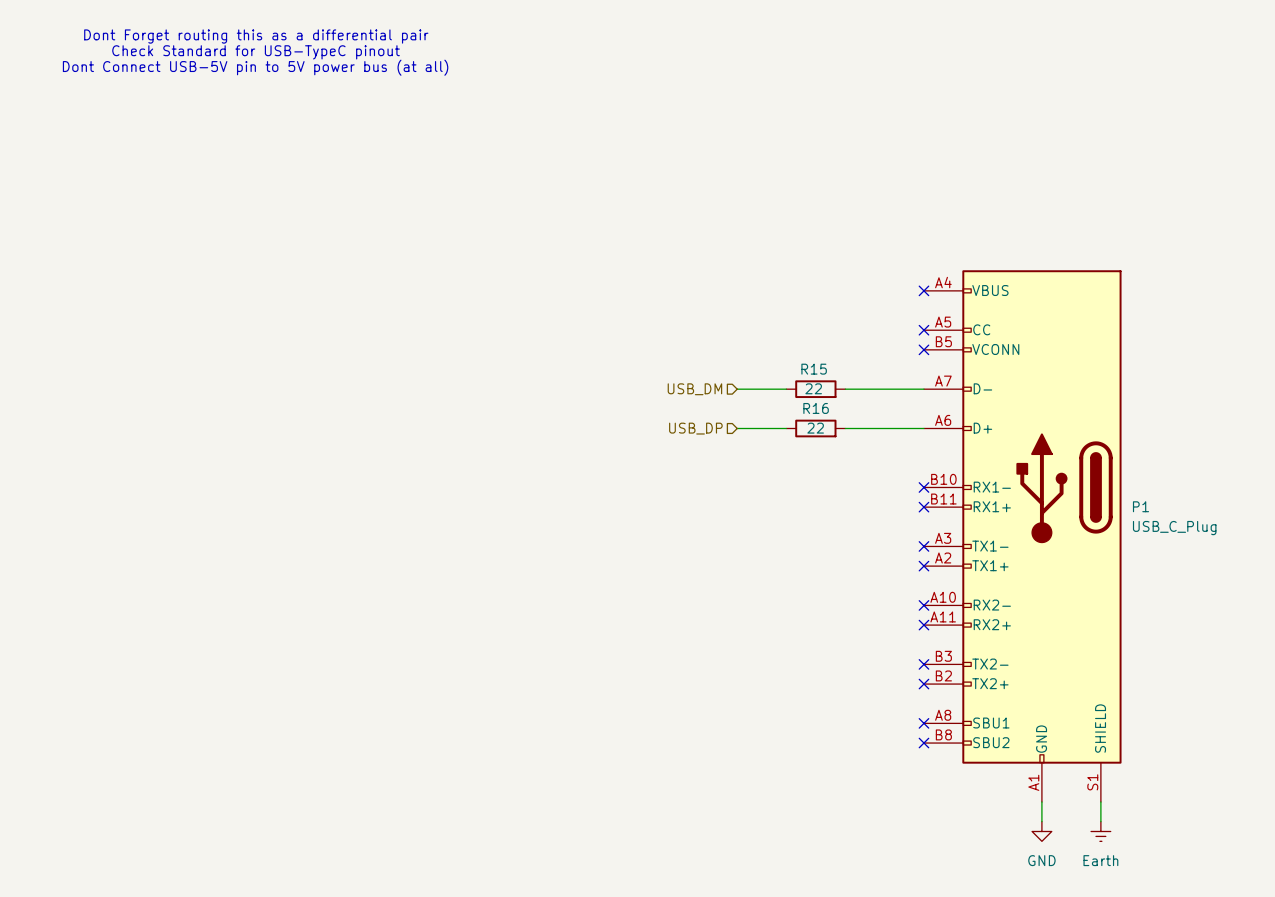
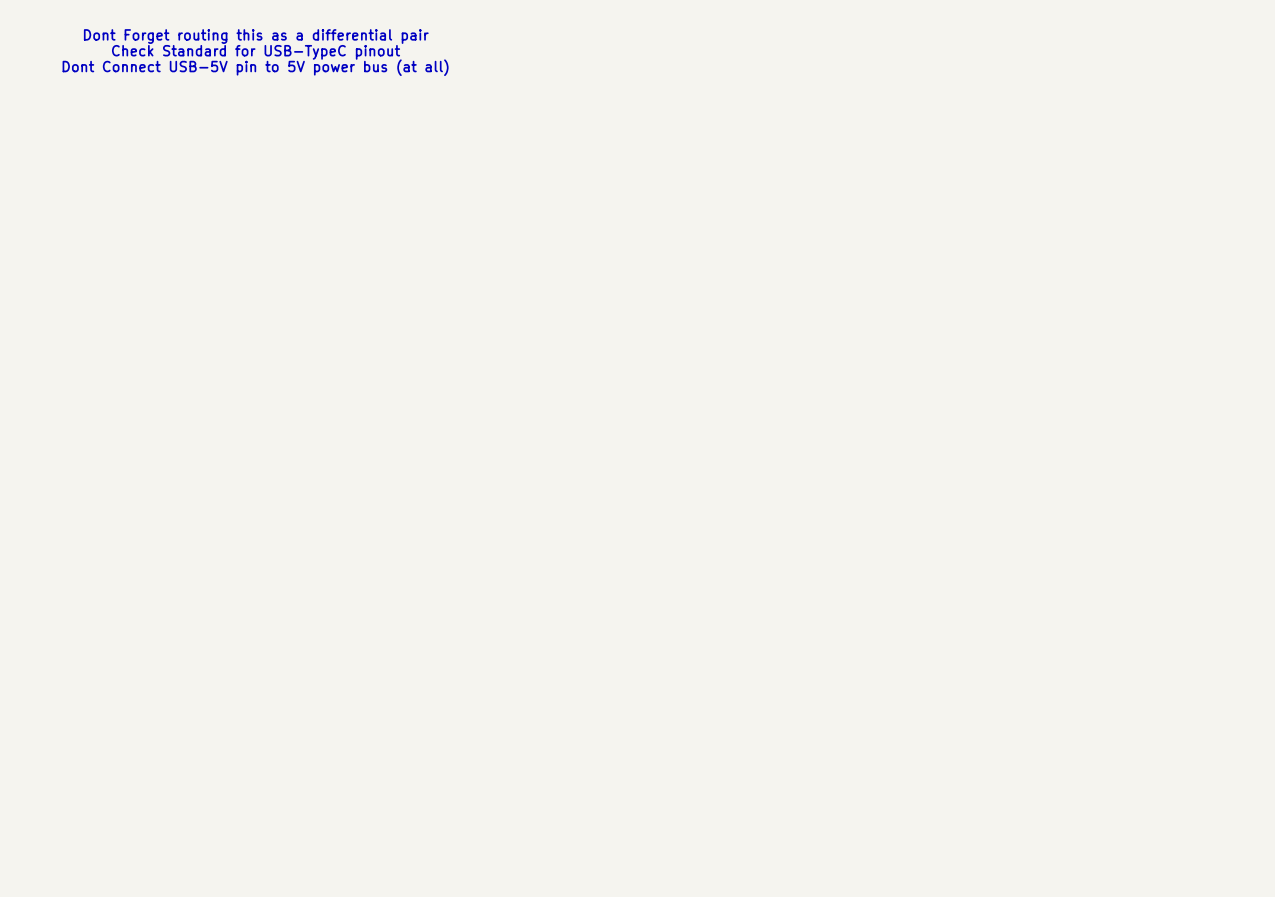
no-connect mark: (923, 290) -> none
no-connect mark: (923, 330) -> none
no-connect mark: (923, 349) -> none
hierarchical label: USB_DM (694, 389) -> none
wire: (737, 389) (786, 389) -> none
R15: 22 (815, 389) -> none
wire: (845, 389) (923, 389) -> none
hierarchical label: USB_DP (695, 428) -> none
wire: (737, 428) (786, 428) -> none
R16: 22 (815, 428) -> none
wire: (845, 428) (923, 428) -> none
no-connect mark: (923, 487) -> none
no-connect mark: (923, 507) -> none
P1: USB_C_Plug (1022, 536) -> none
no-connect mark: (923, 546) -> none
no-connect mark: (923, 566) -> none
no-connect mark: (923, 605) -> none
no-connect mark: (923, 625) -> none
no-connect mark: (923, 664) -> none
no-connect mark: (923, 684) -> none
no-connect mark: (923, 723) -> none
no-connect mark: (923, 743) -> none
wire: (1041, 802) (1041, 821) -> none
wire: (1100, 802) (1100, 821) -> none
power symbol: GND (1041, 831) -> none
power symbol: Earth (1100, 831) -> none

